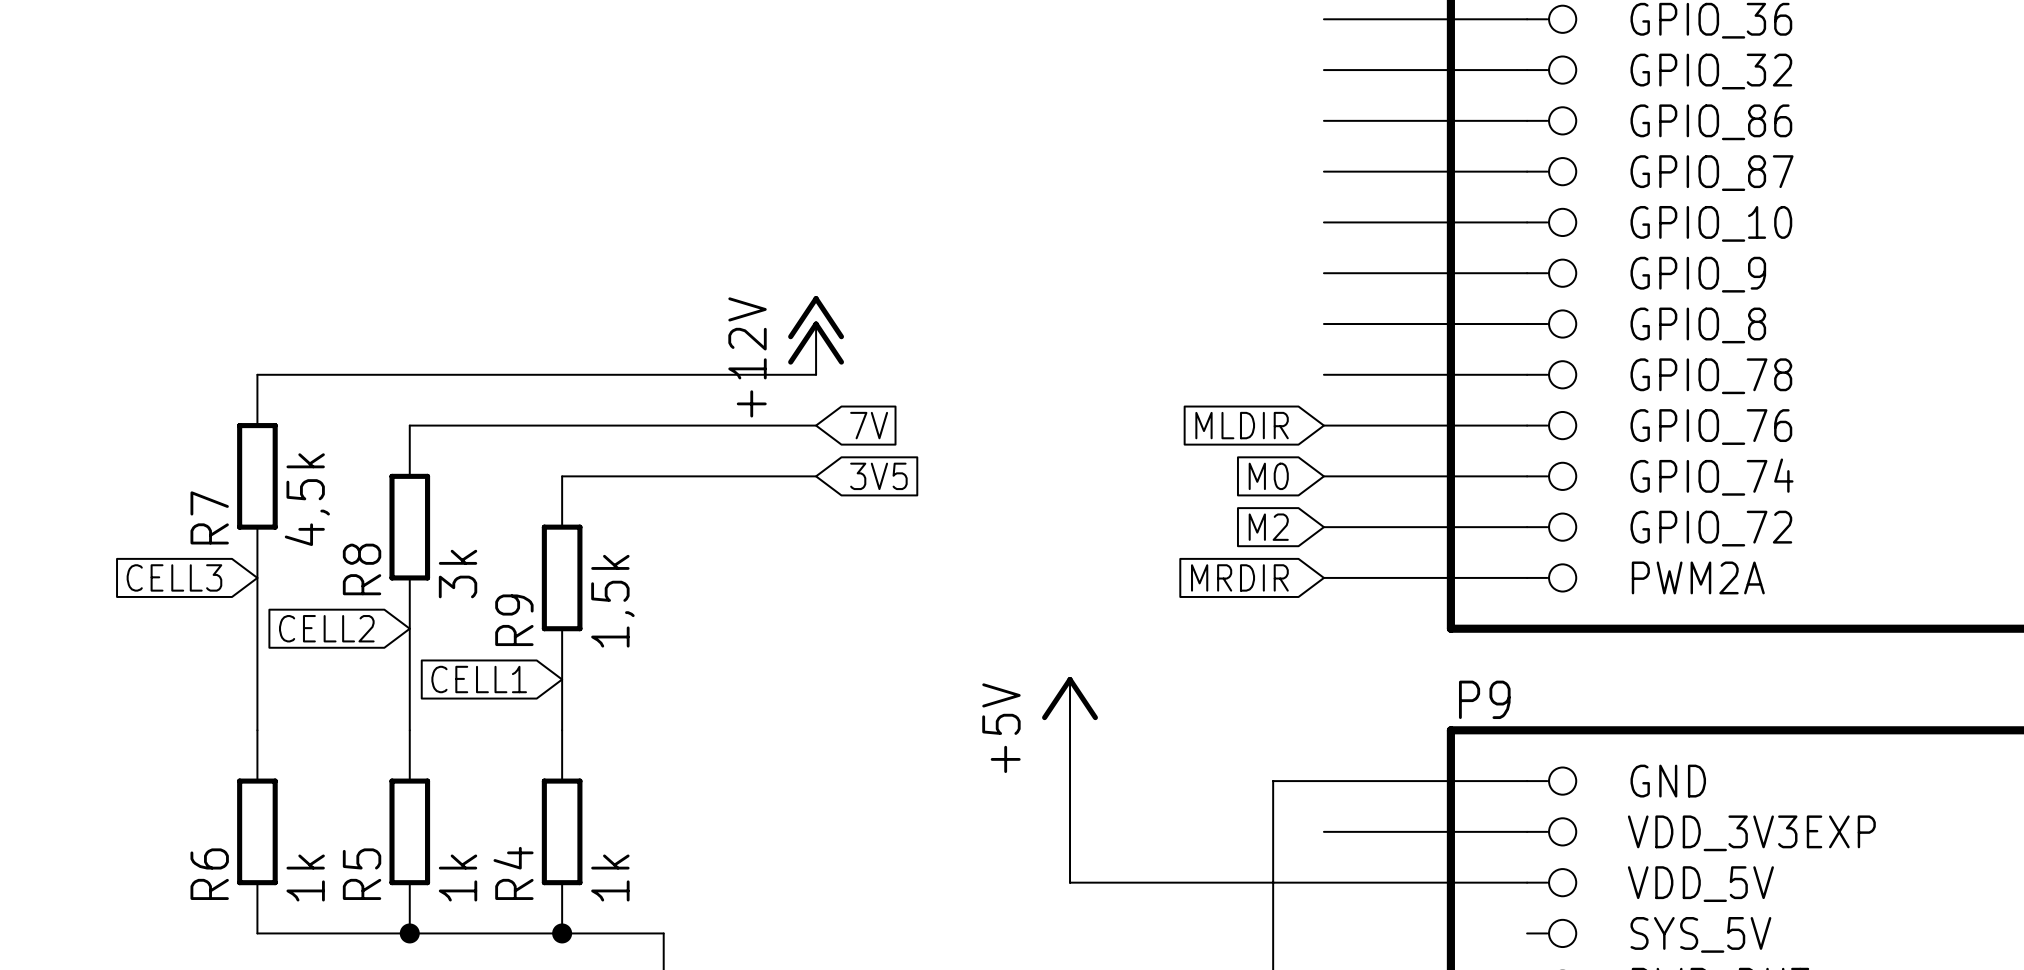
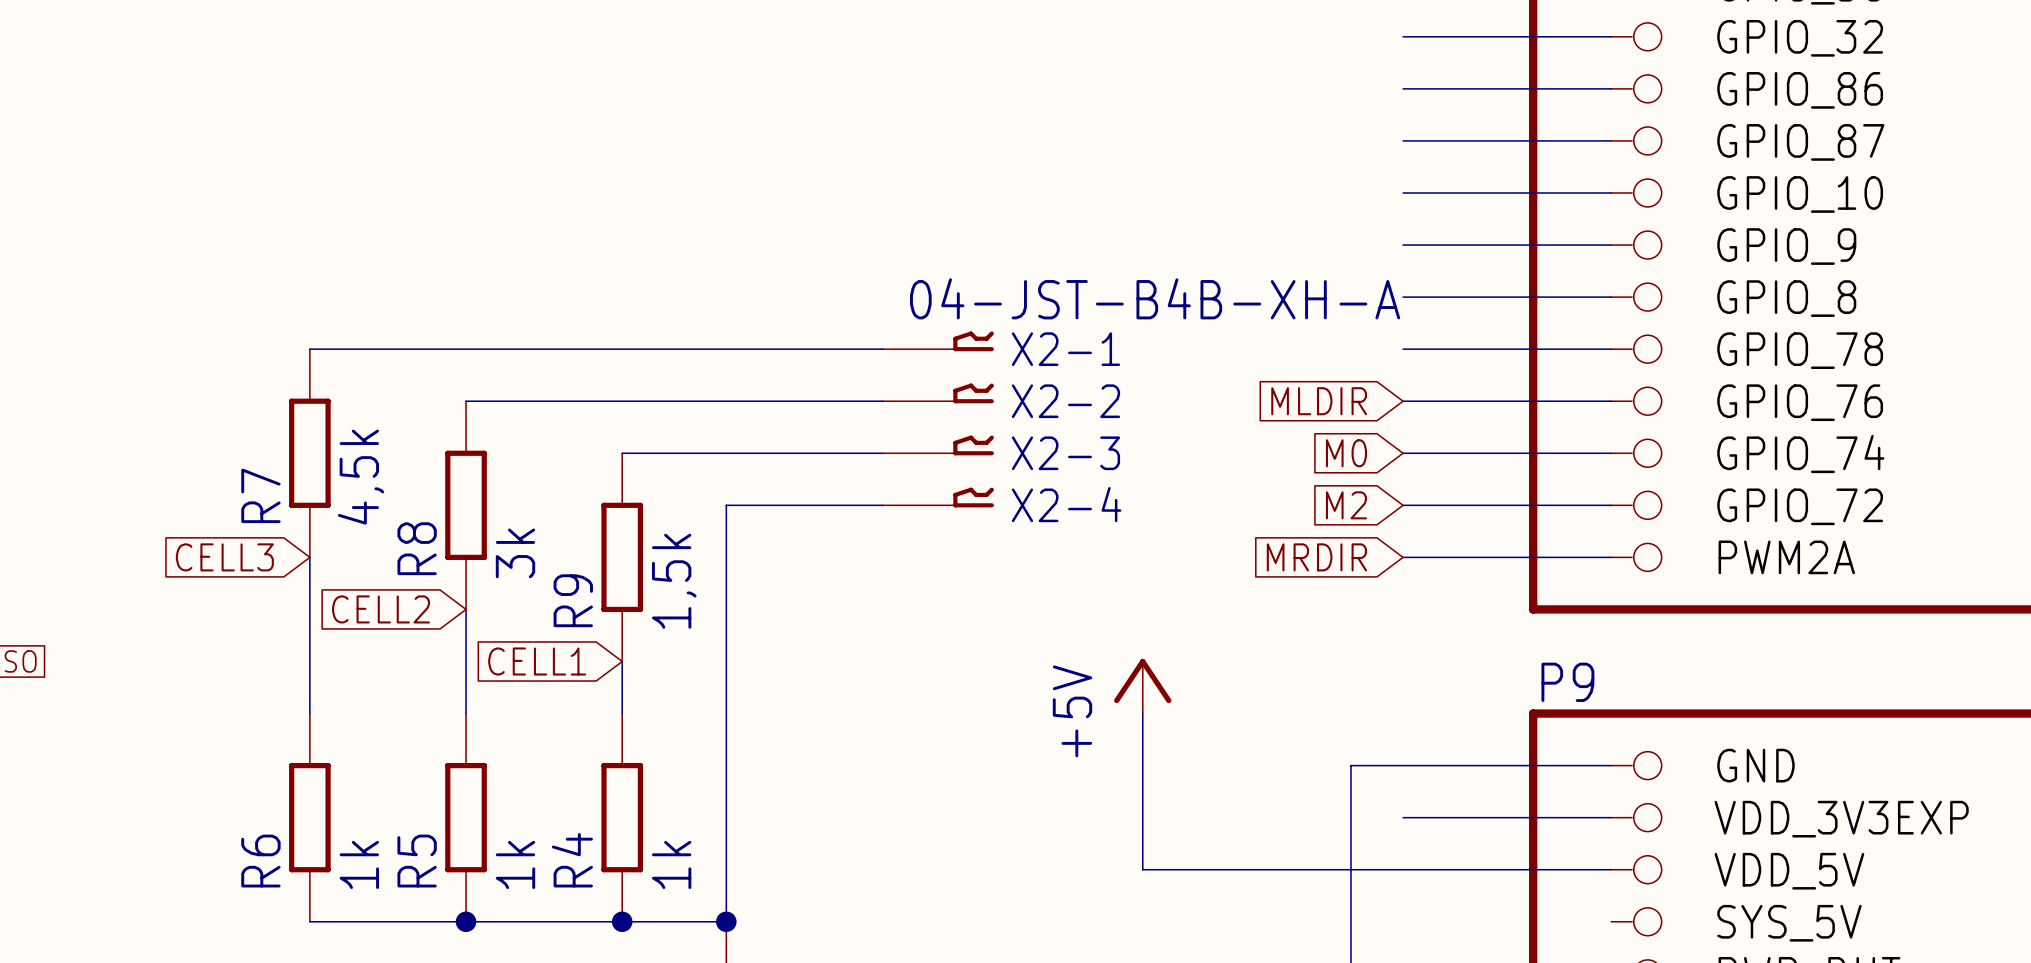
power symbol: +12V (816, 335) -> none
X2-1: none -> 04-JST-B4B-XH-A (938, 341)
X2-2: none -> (938, 393)
global label: 7V (869, 425) -> none
X2-3: none -> (938, 445)
global label: 3V5 (878, 476) -> none
X2-4: none -> (938, 497)
wire: none -> (882, 505) (726, 505) (726, 921)
junction: none -> (726, 921)

